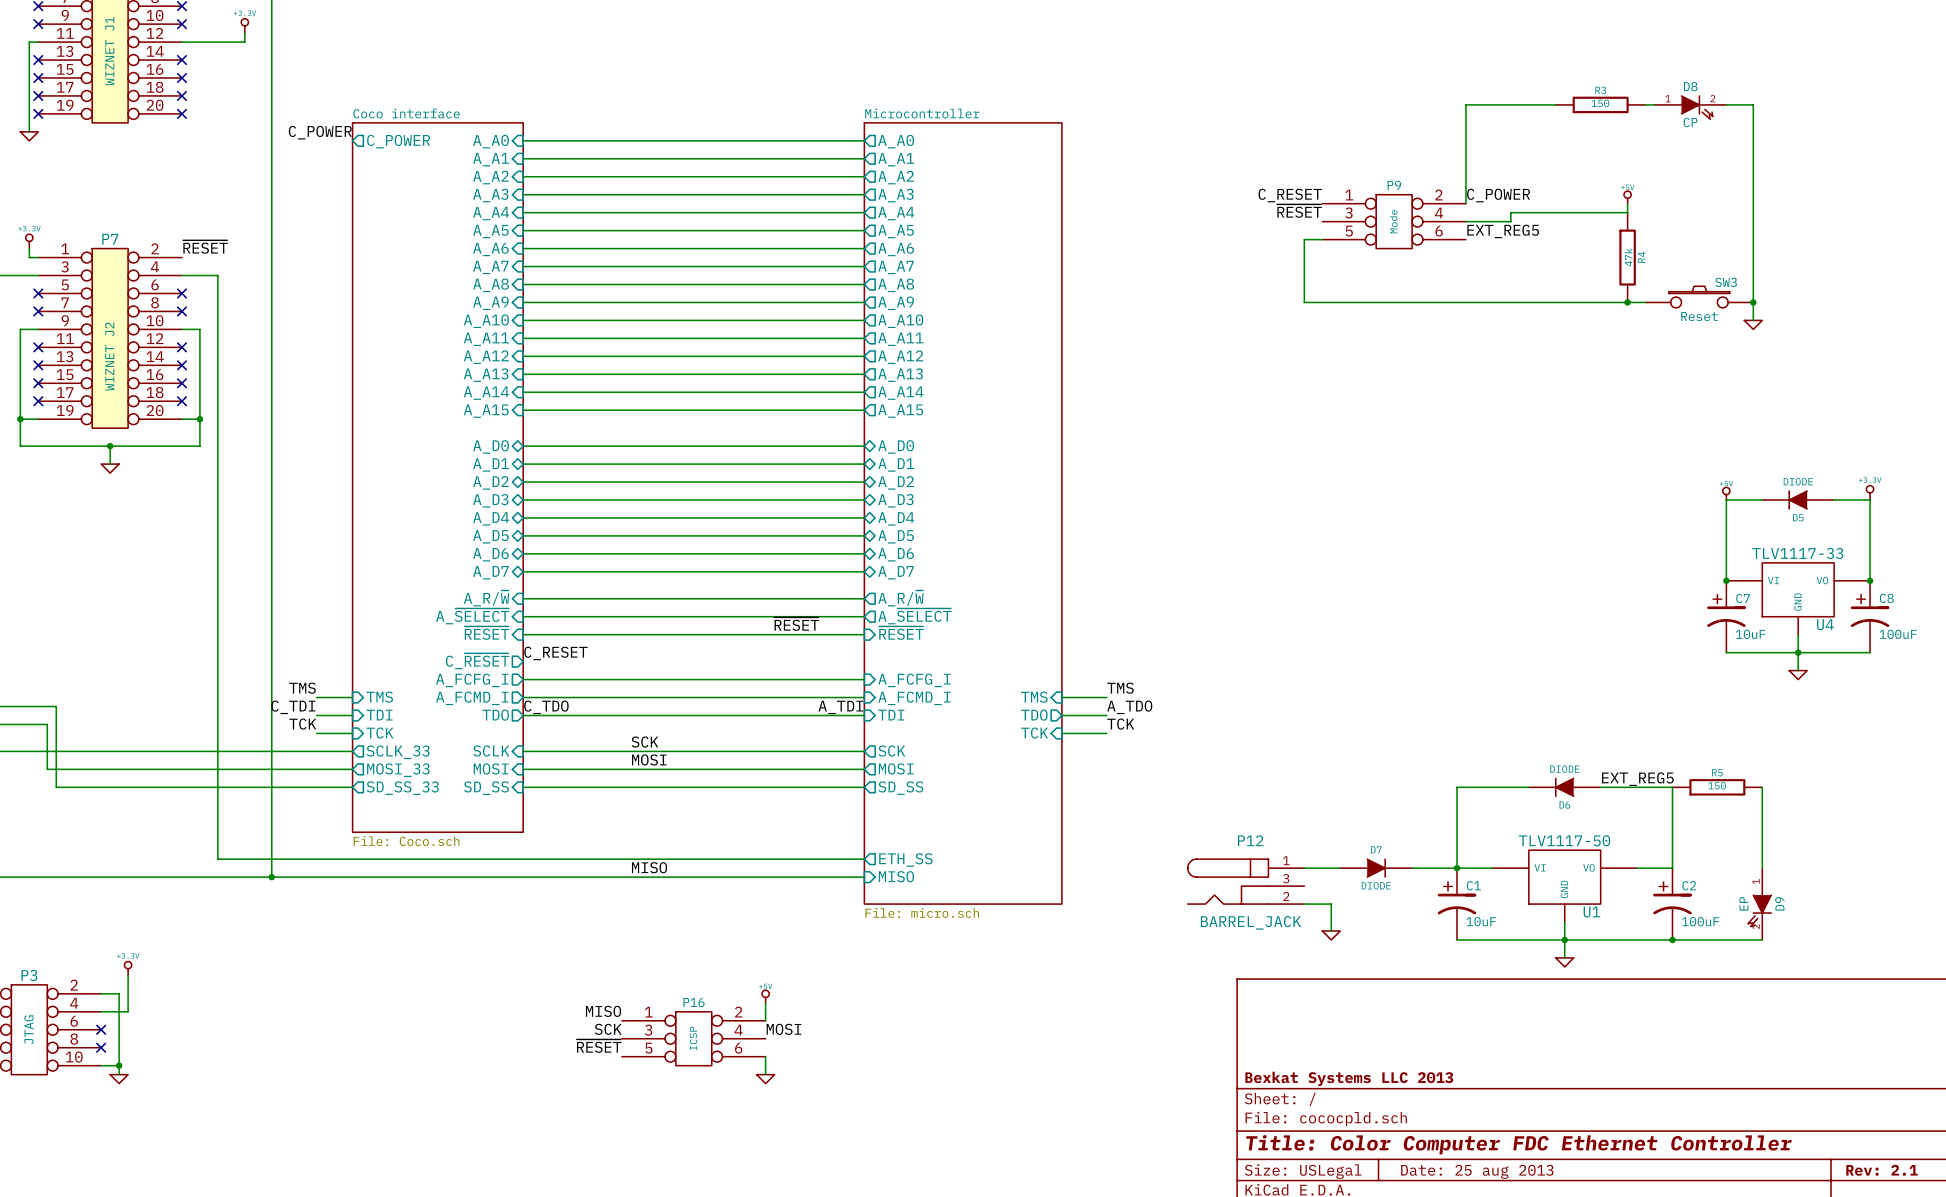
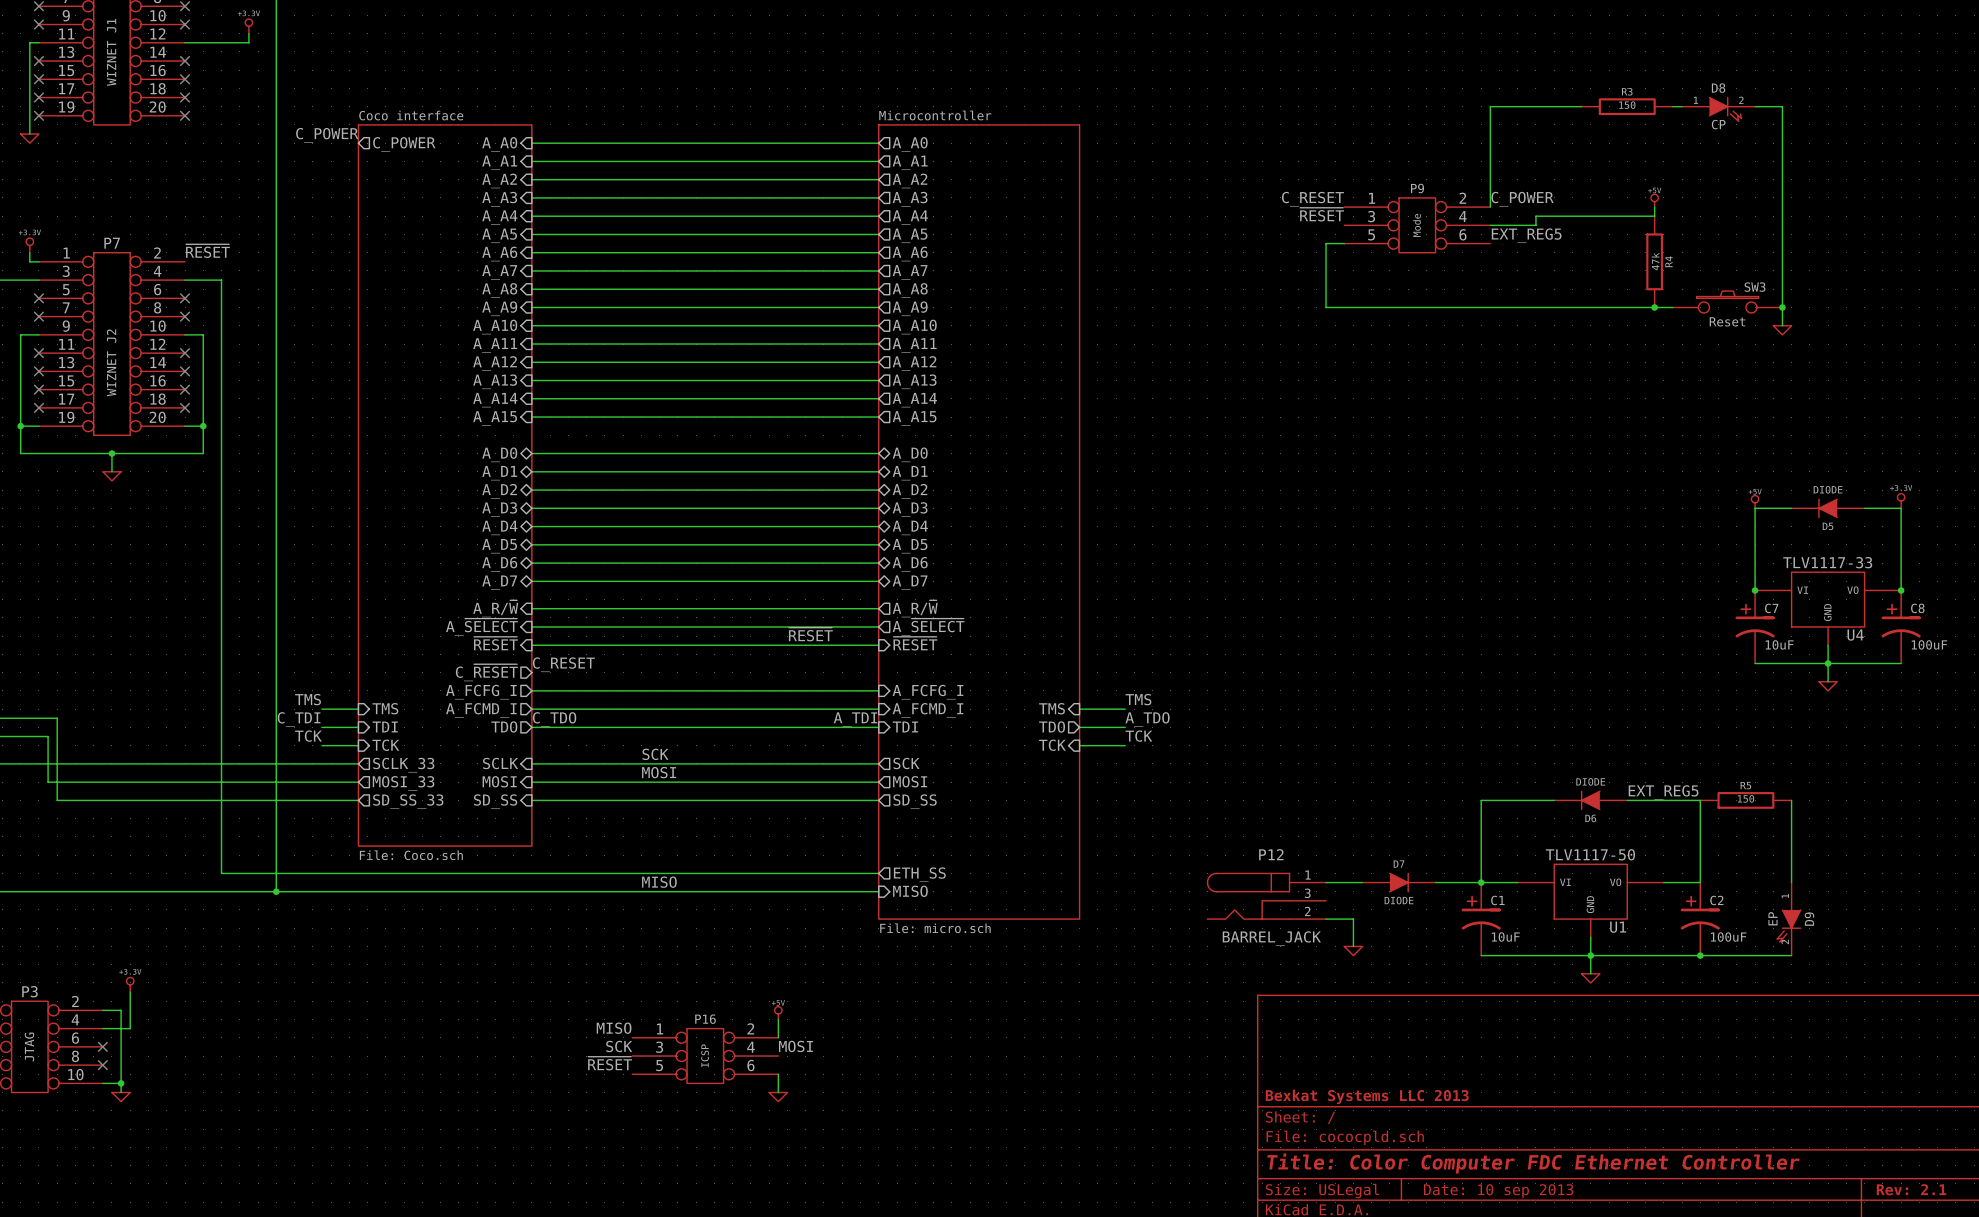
title block: Date: 25 aug 2013 (1477, 1171) -> Date: 10 sep 2013 (1498, 1191)

